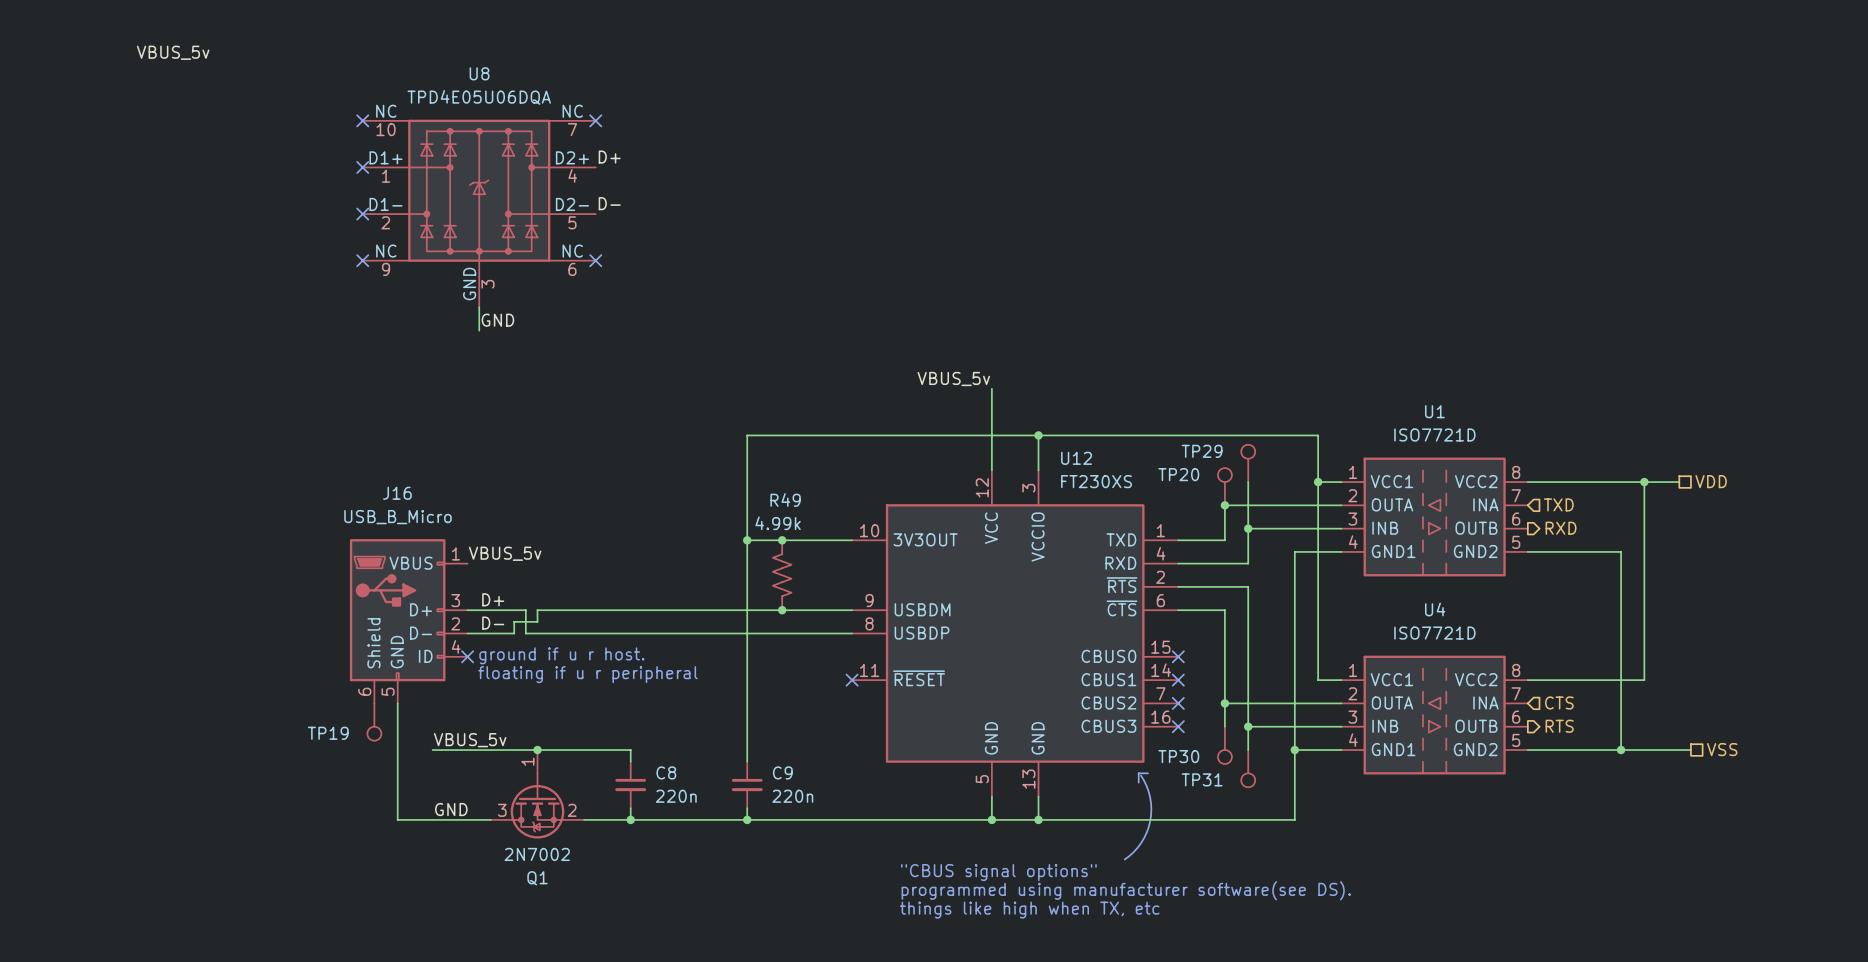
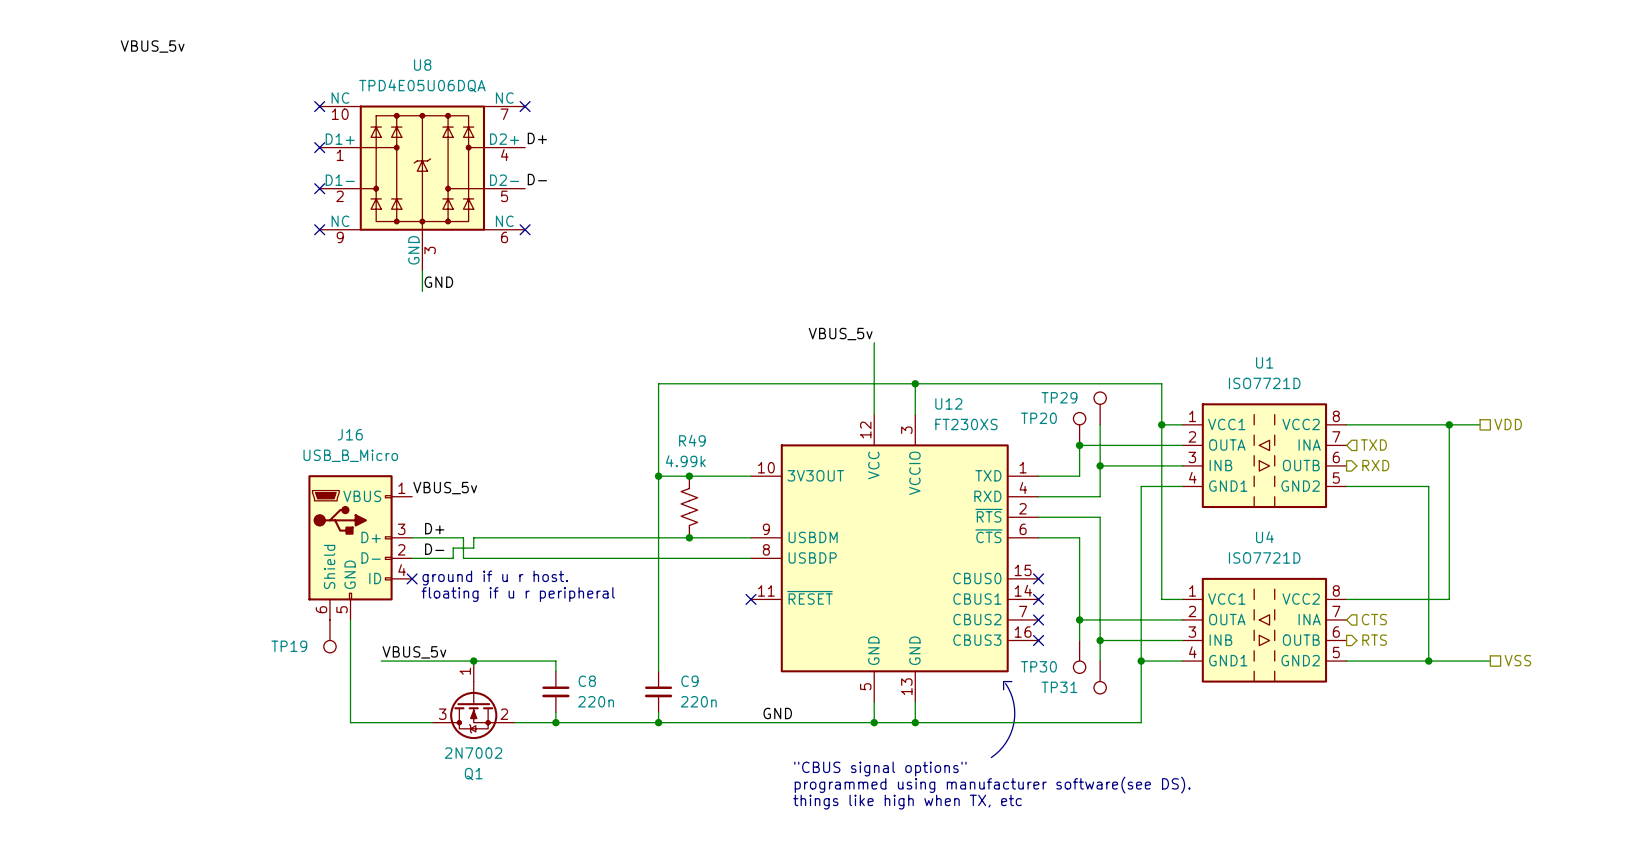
label: GND (451, 809) -> none
label: none -> GND (777, 713)

